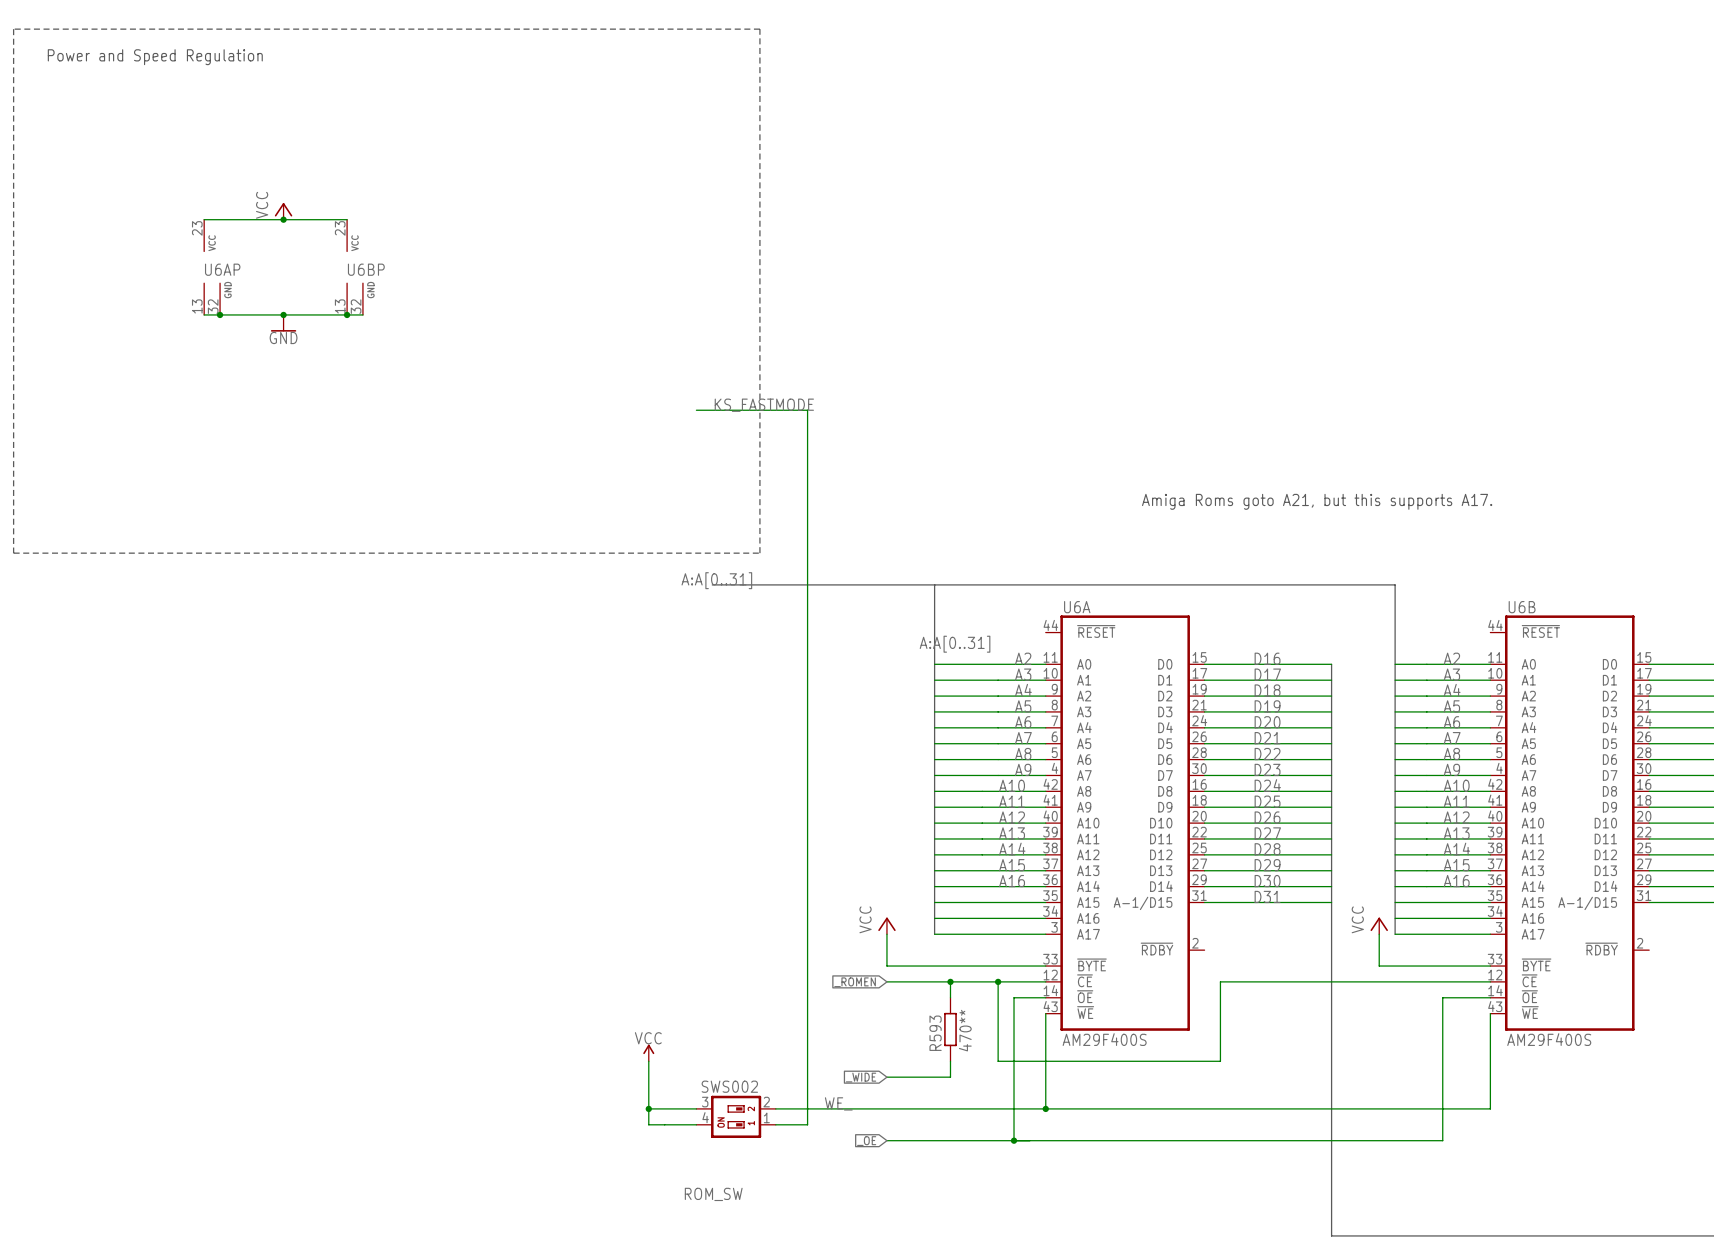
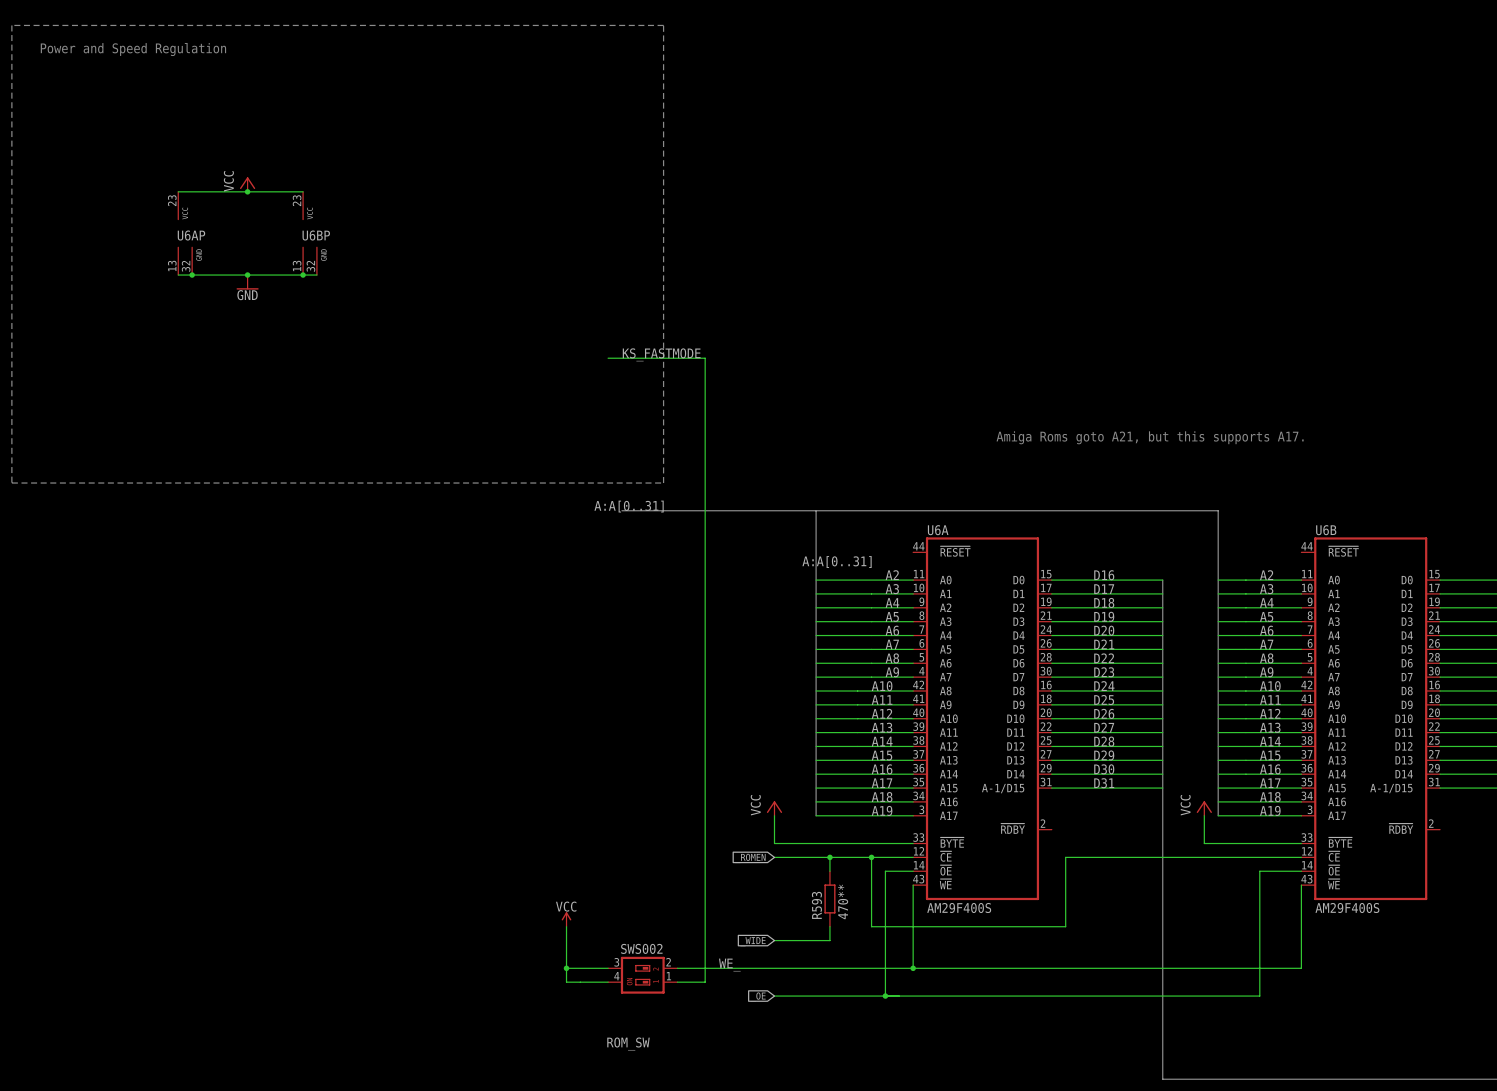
label: none -> A17 (882, 783)
label: none -> A17 (1270, 783)
label: none -> A18 (882, 797)
label: none -> A18 (1270, 797)
label: none -> A19 (882, 810)
label: none -> A19 (1270, 810)

